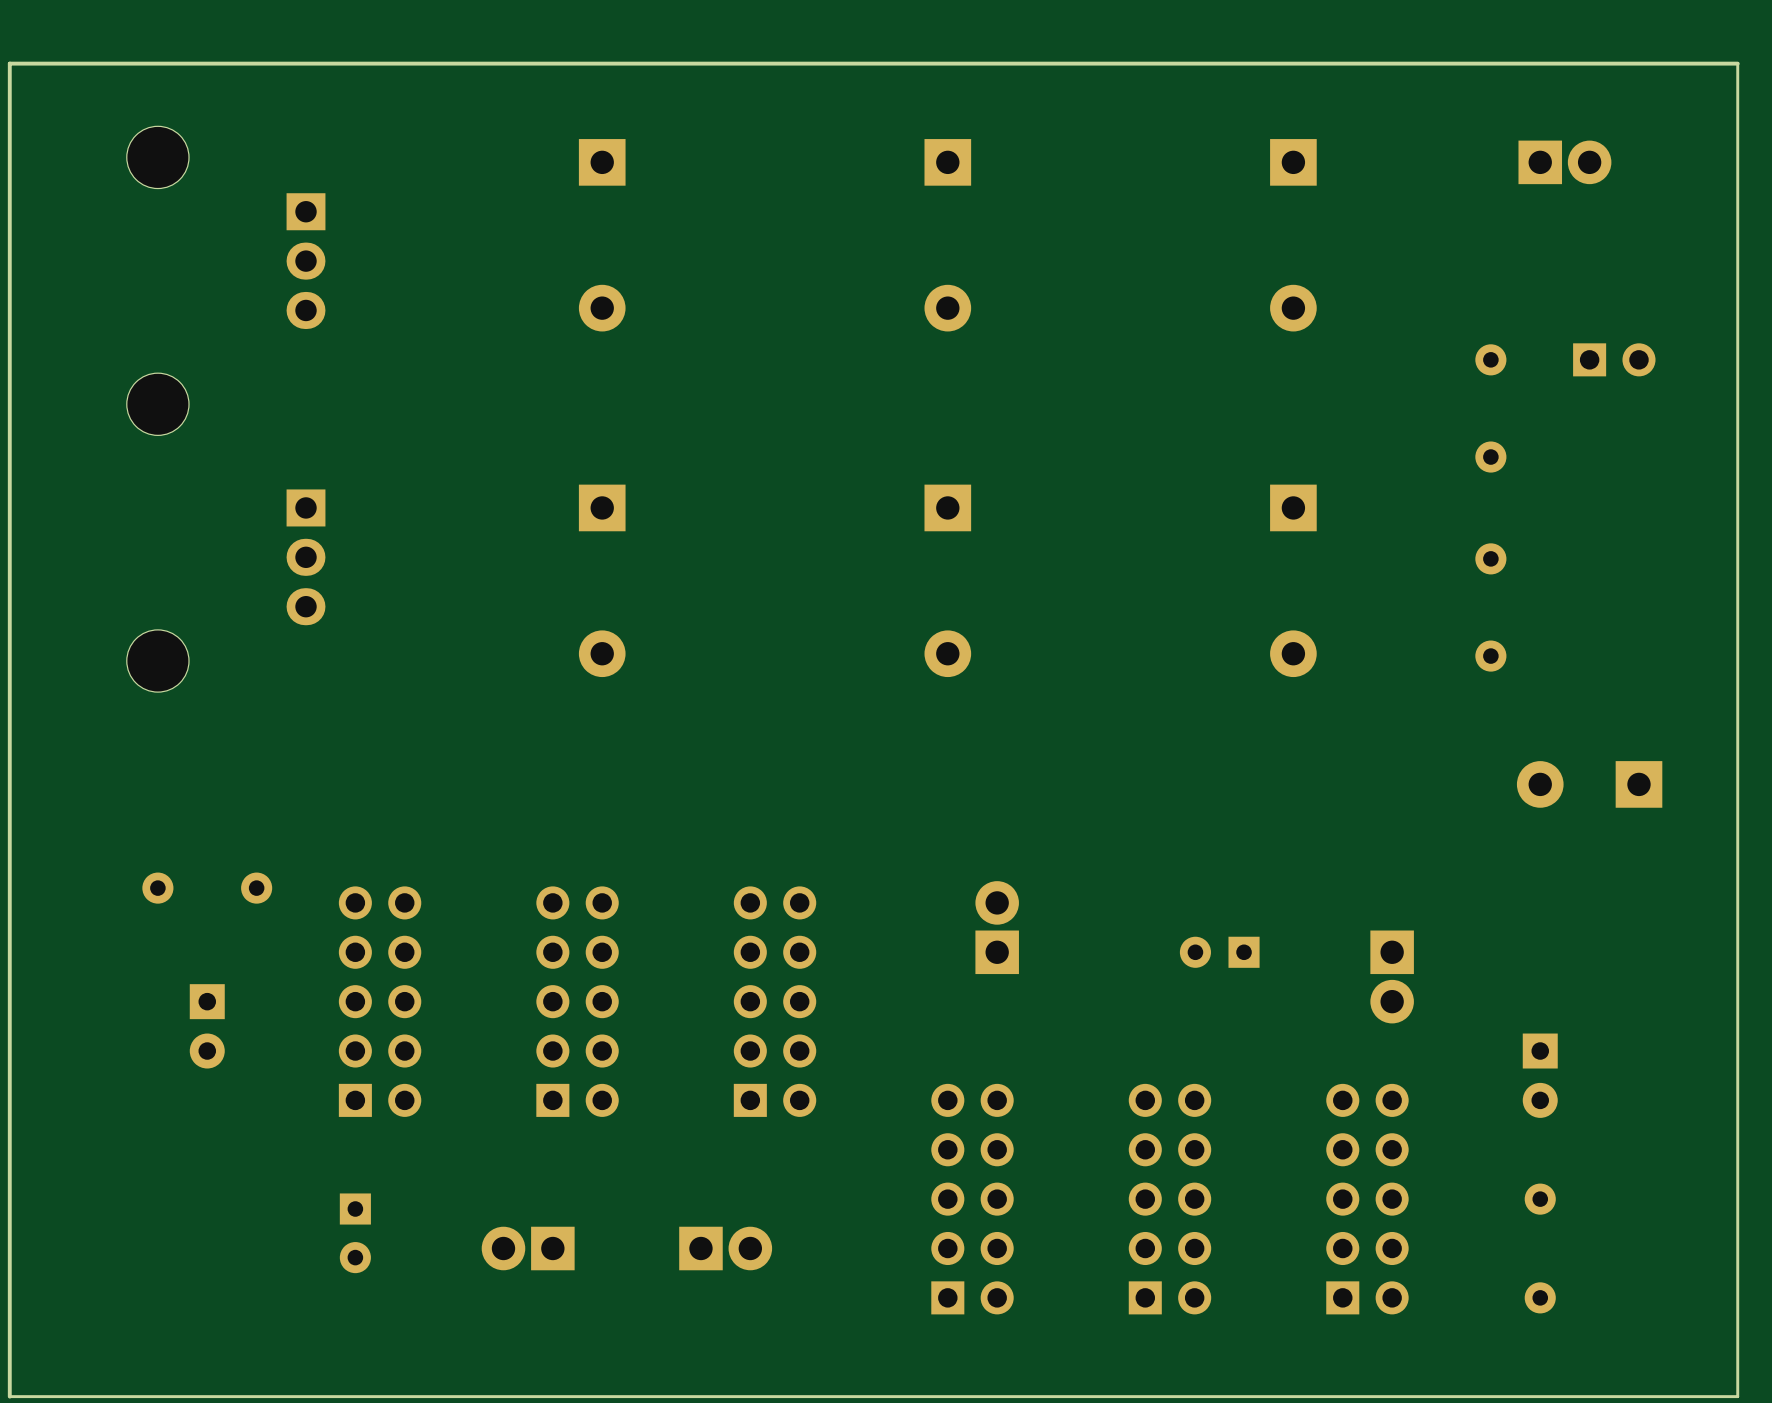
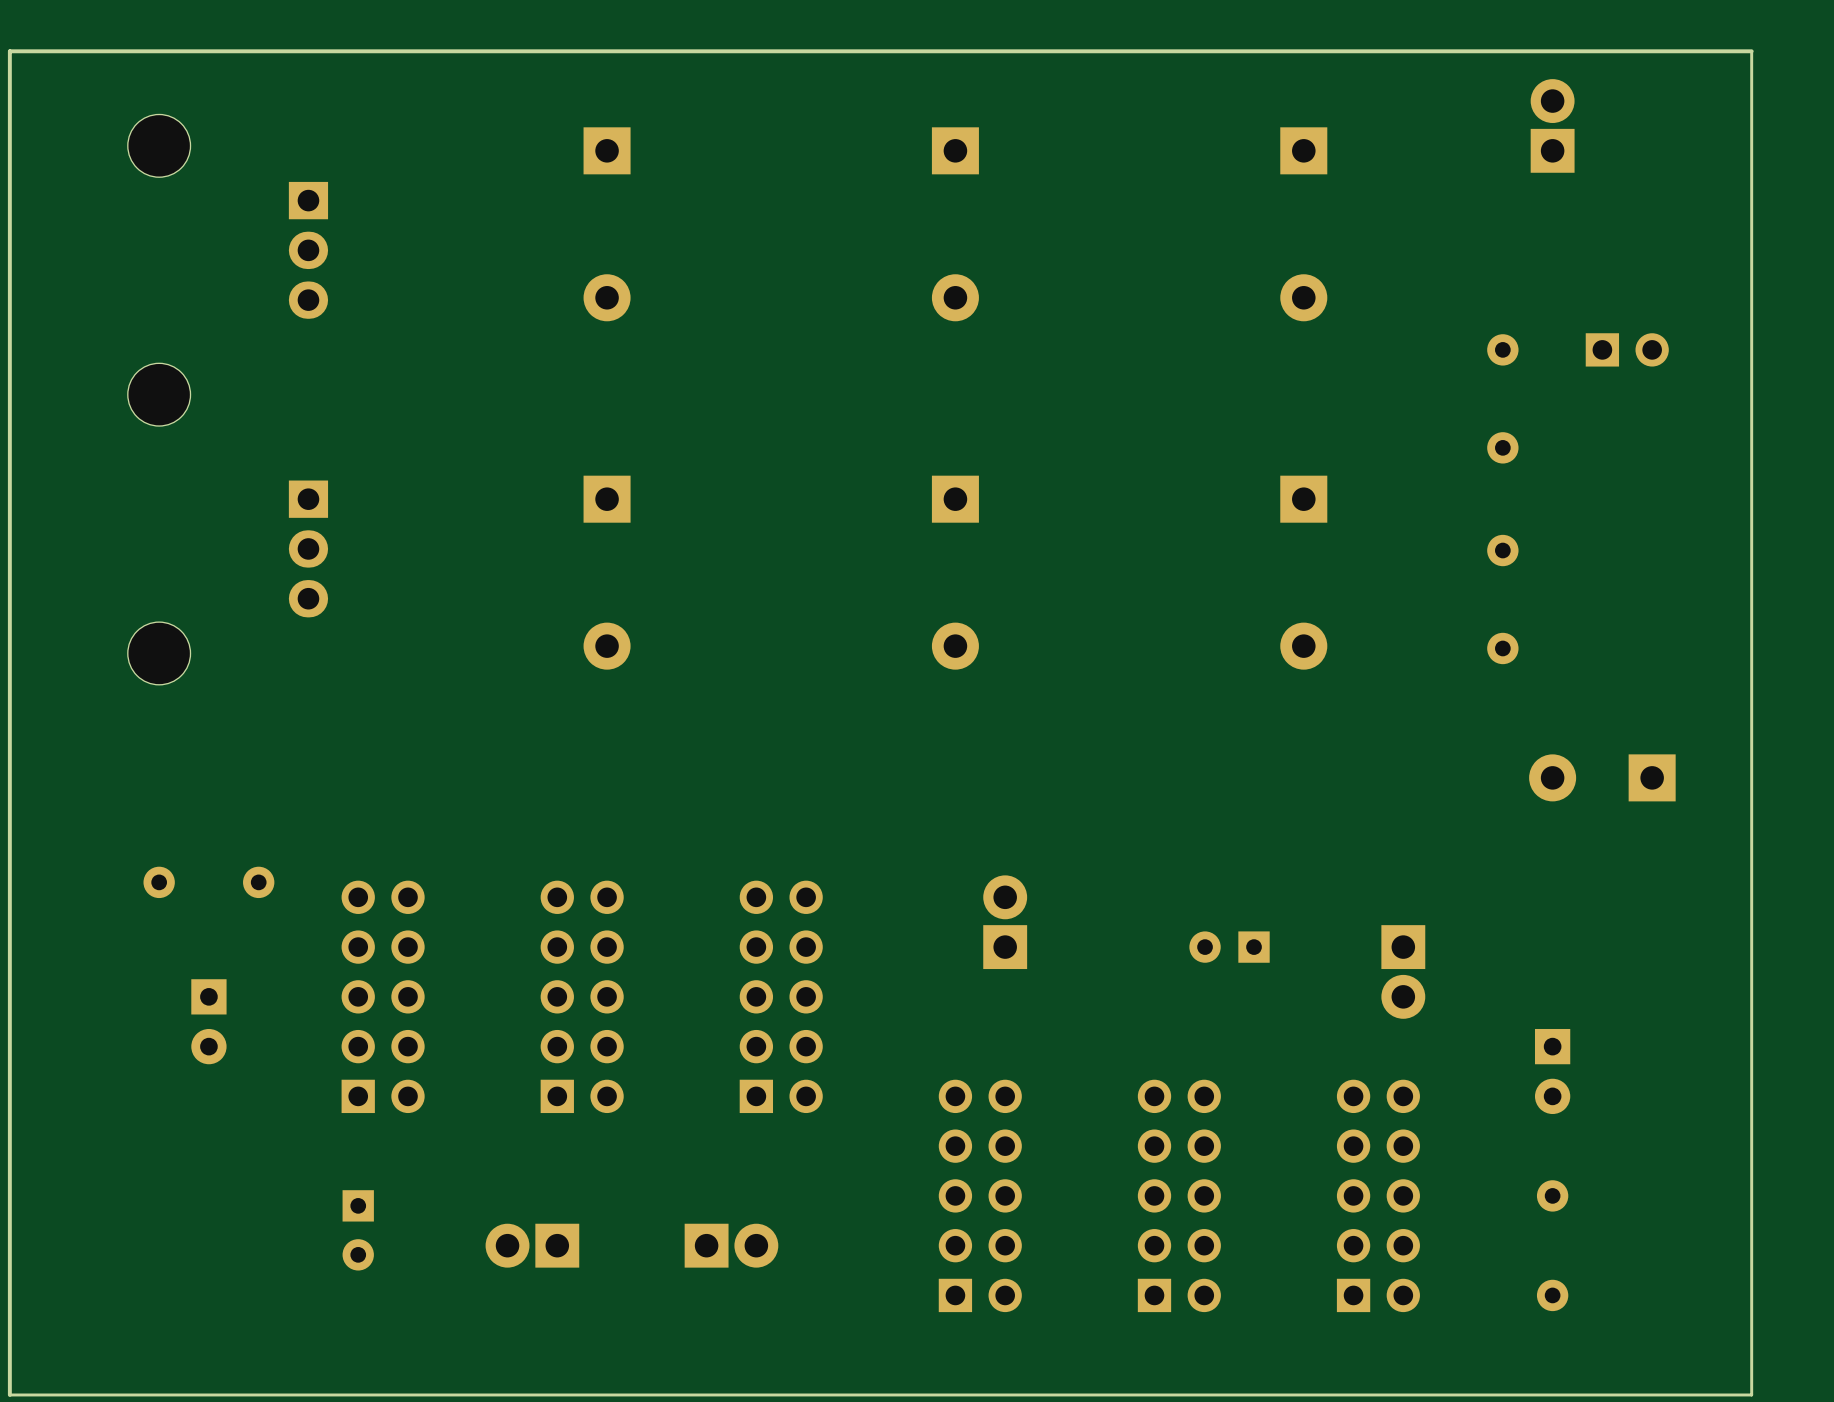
part rotation: 0° (1564, 162) -> 90° counterclockwise (1552, 125)

